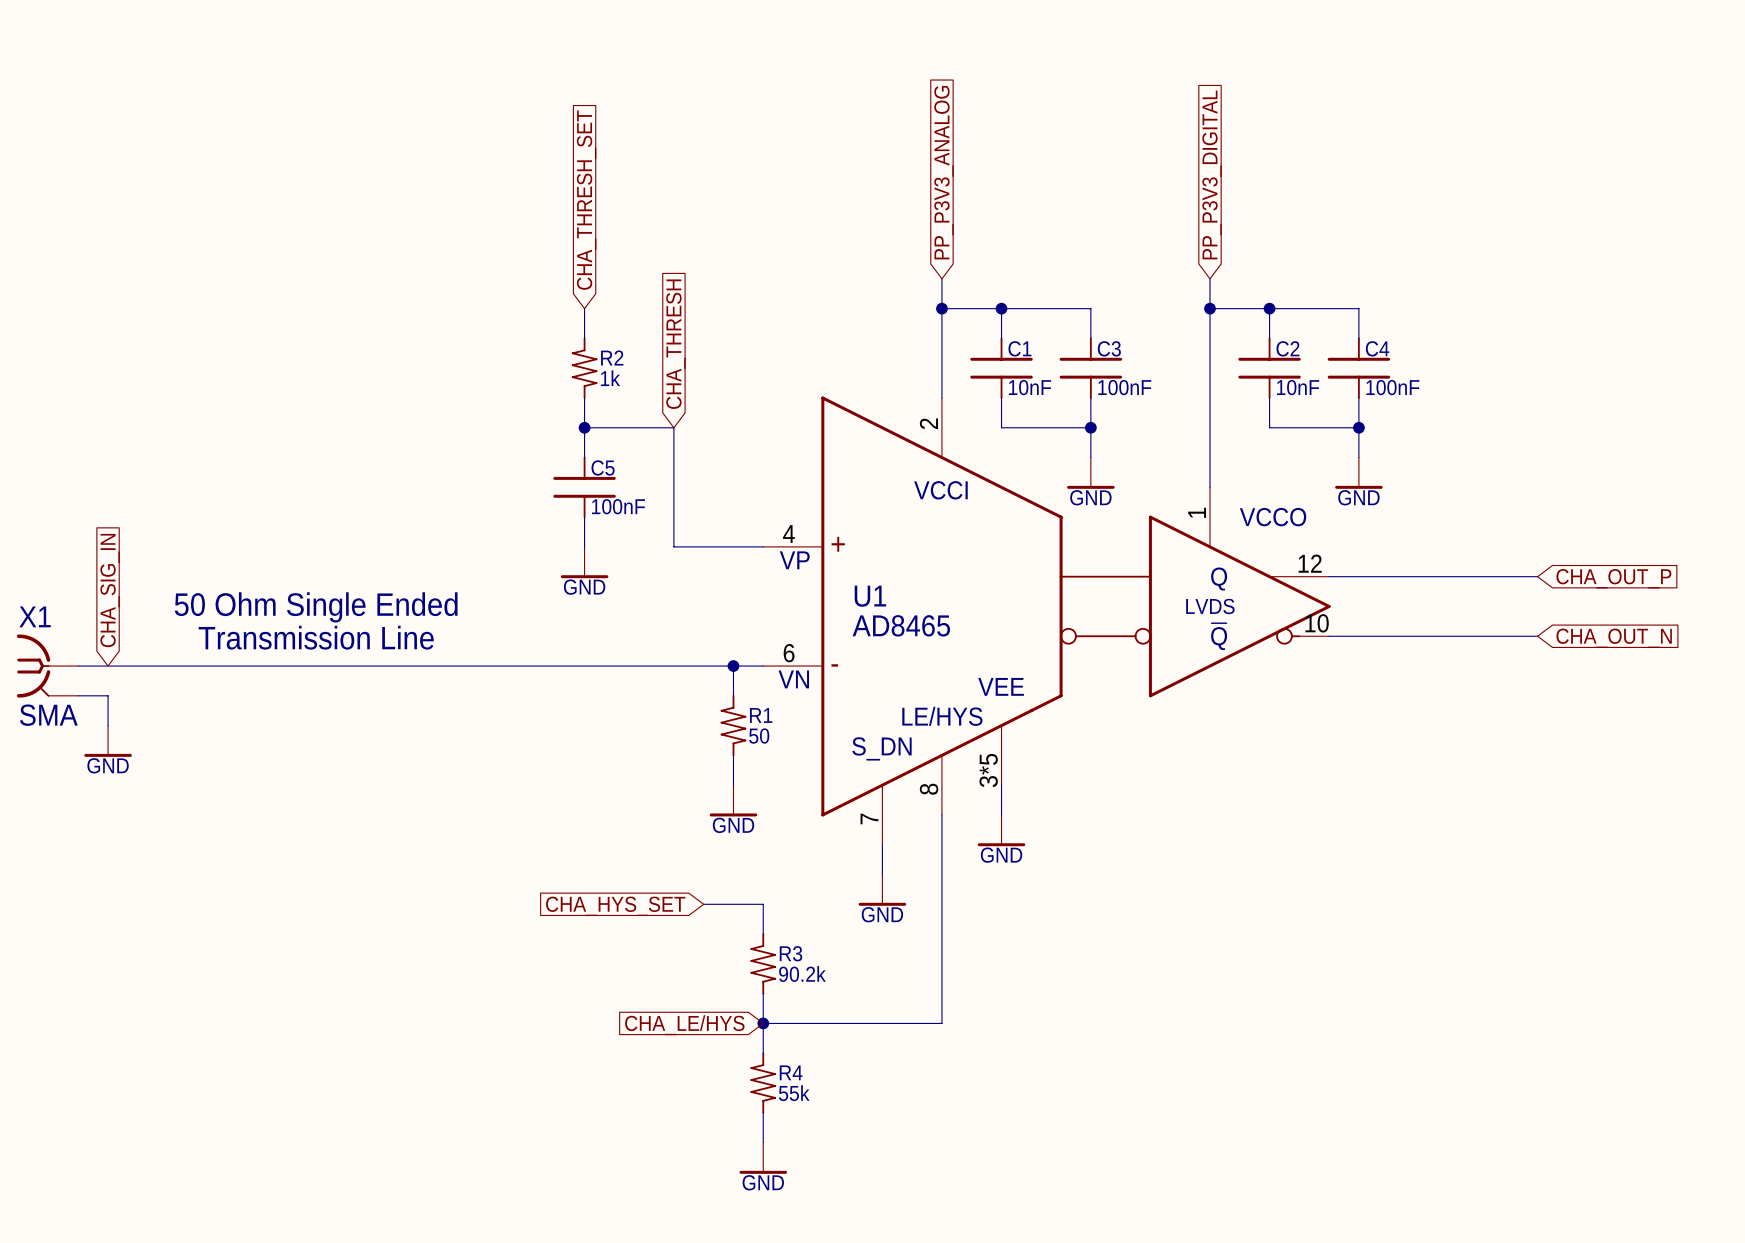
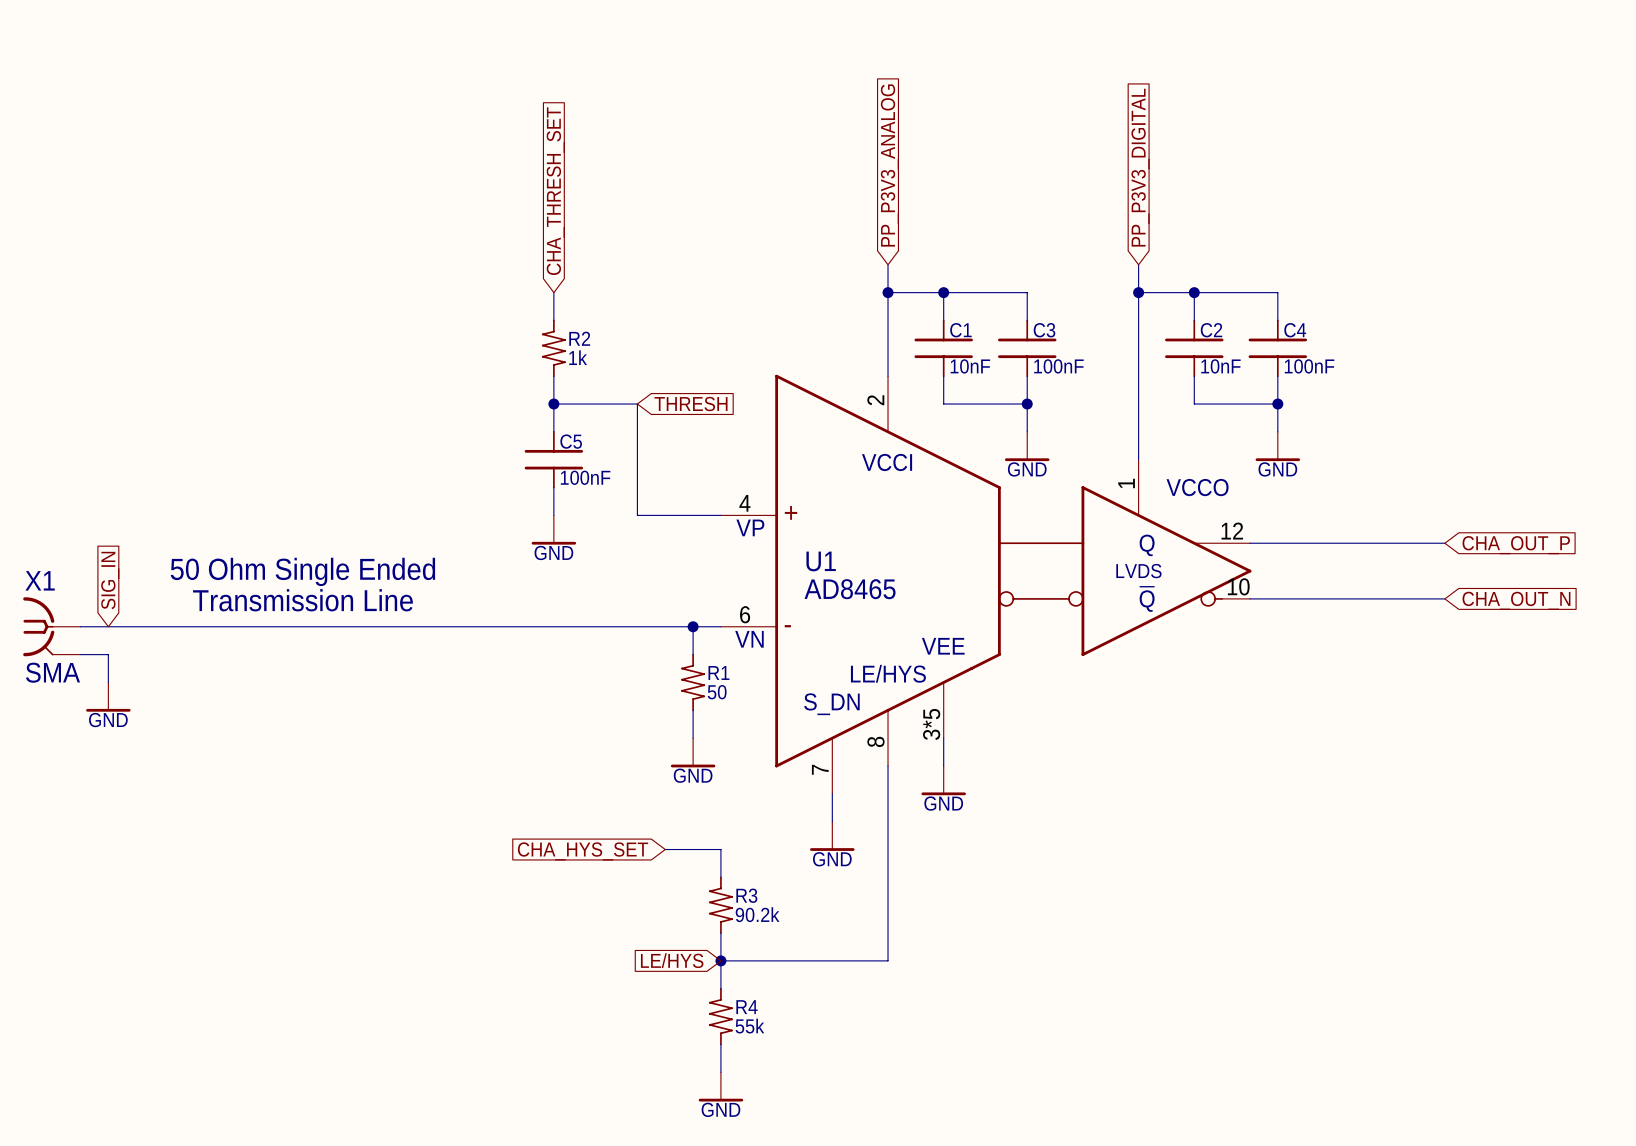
global label: CHA_THRESH (675, 344) -> THRESH (691, 404)
global label: CHA_SIG_IN (110, 590) -> SIG_IN (110, 580)
global label: CHA_LE/HYS (684, 1025) -> LE/HYS (672, 960)

